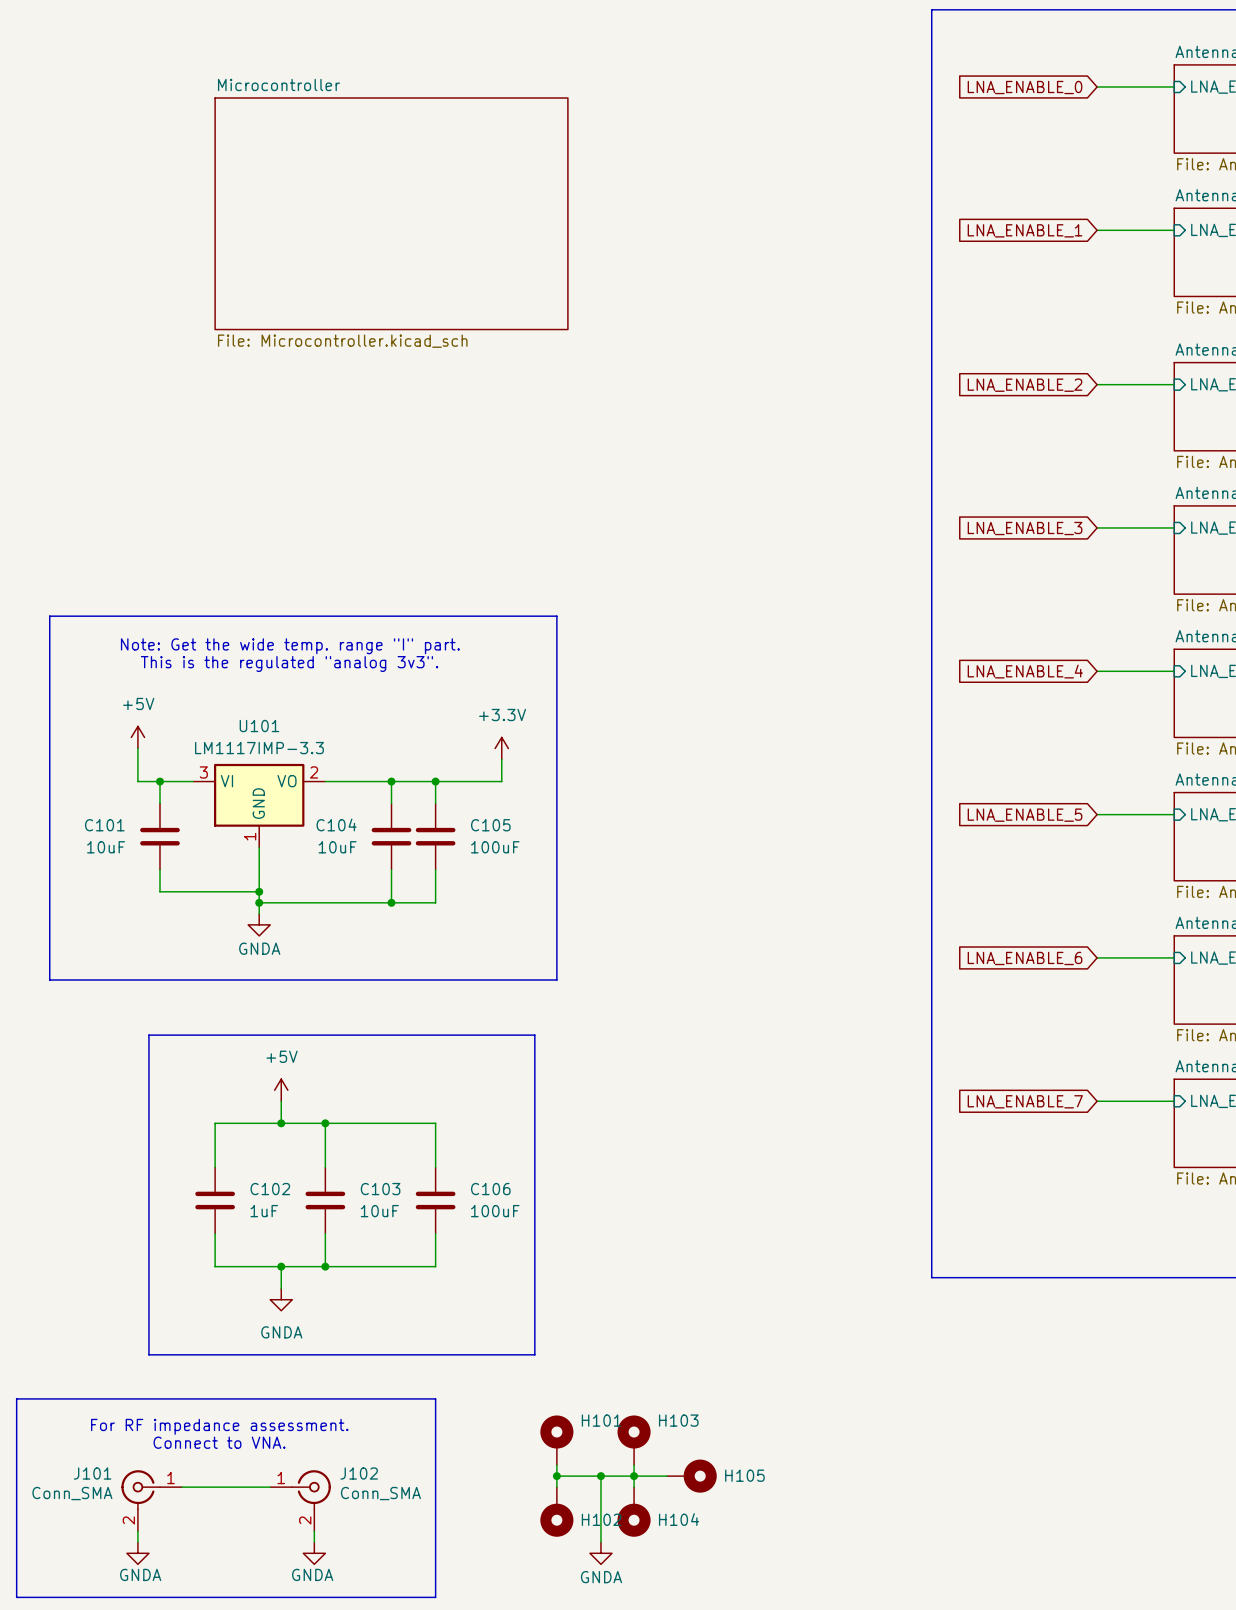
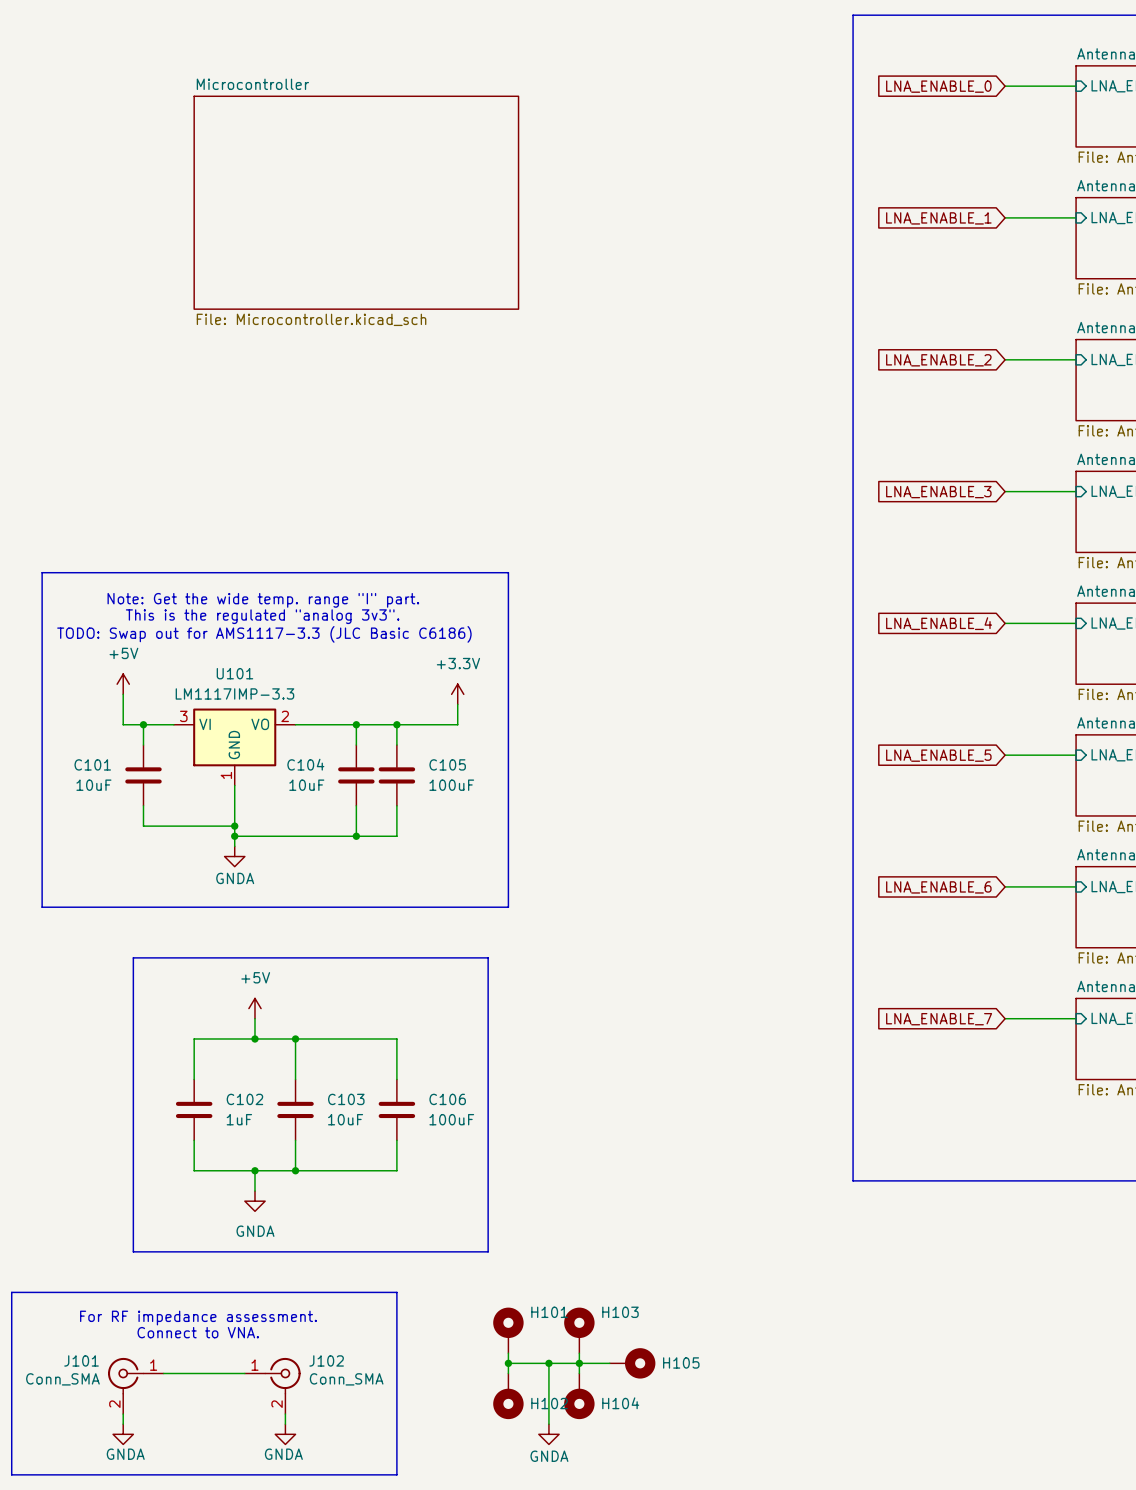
text: none -> TODO: Swap out for AMS1117-3.3 (JLC Basic C6186) (264, 634)

